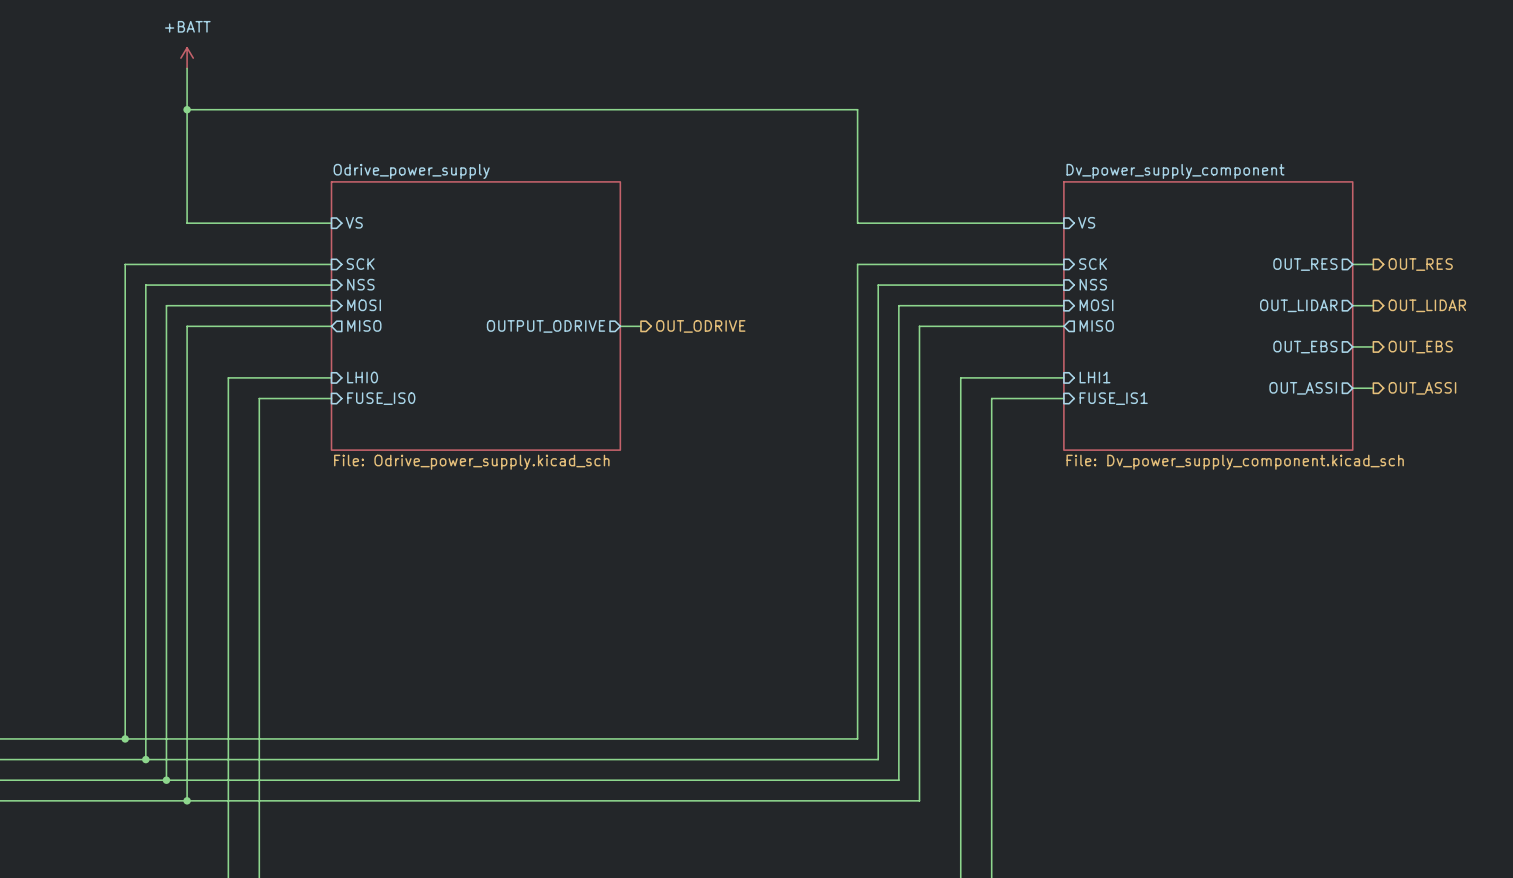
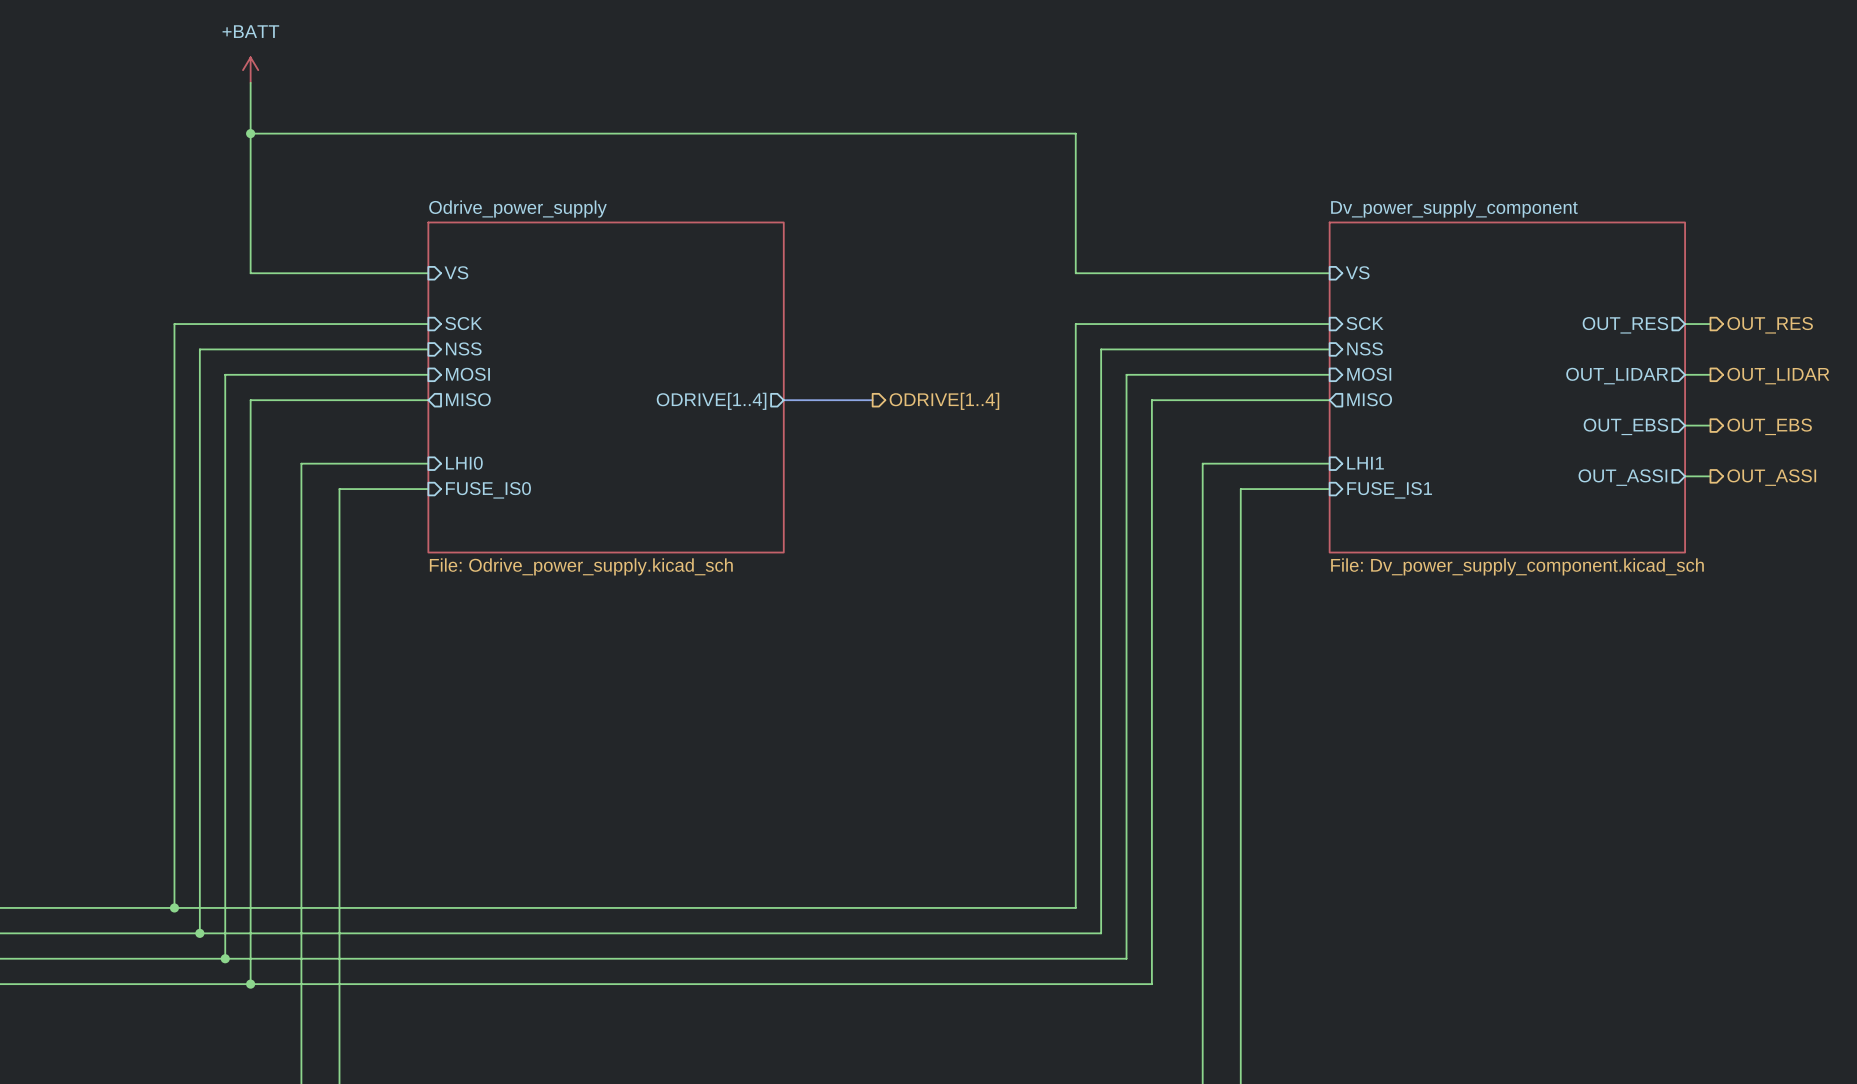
sheet pin: OUTPUT_ODRIVE (546, 326) -> ODRIVE[1..4] (711, 401)
bus: none -> (783, 400) (872, 400)
hierarchical label: OUT_ODRIVE (700, 326) -> none
hierarchical label: none -> ODRIVE[1..4] (944, 401)

